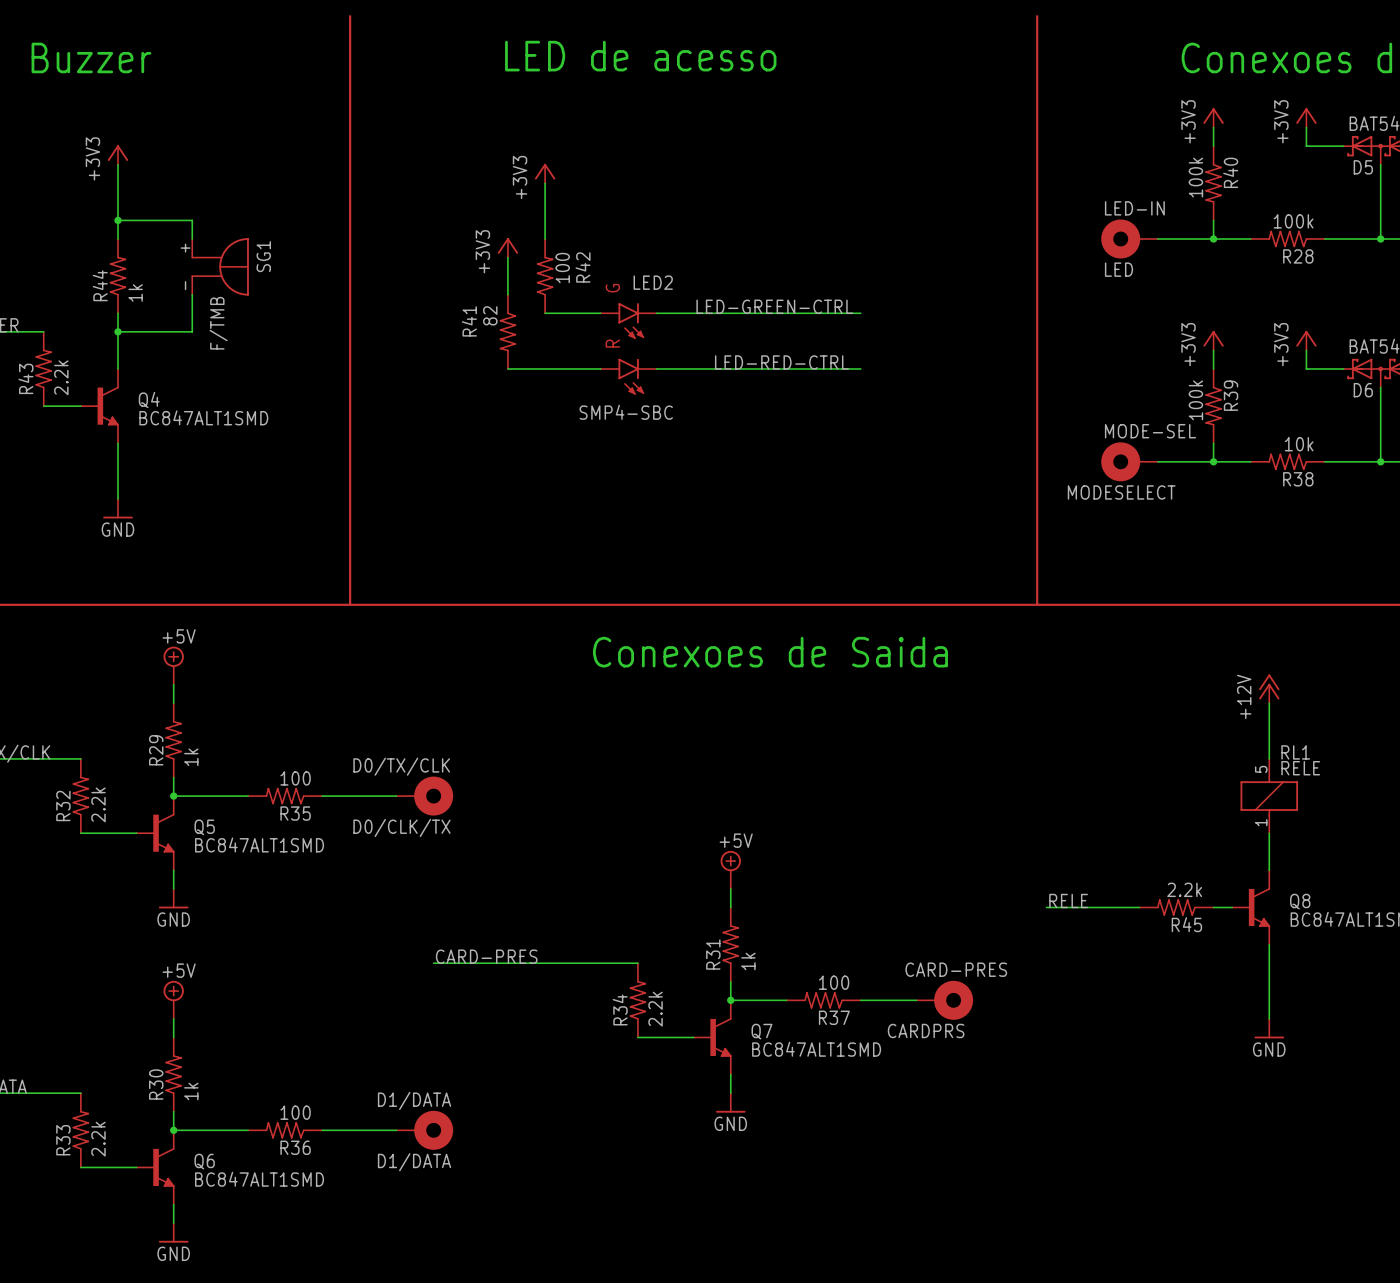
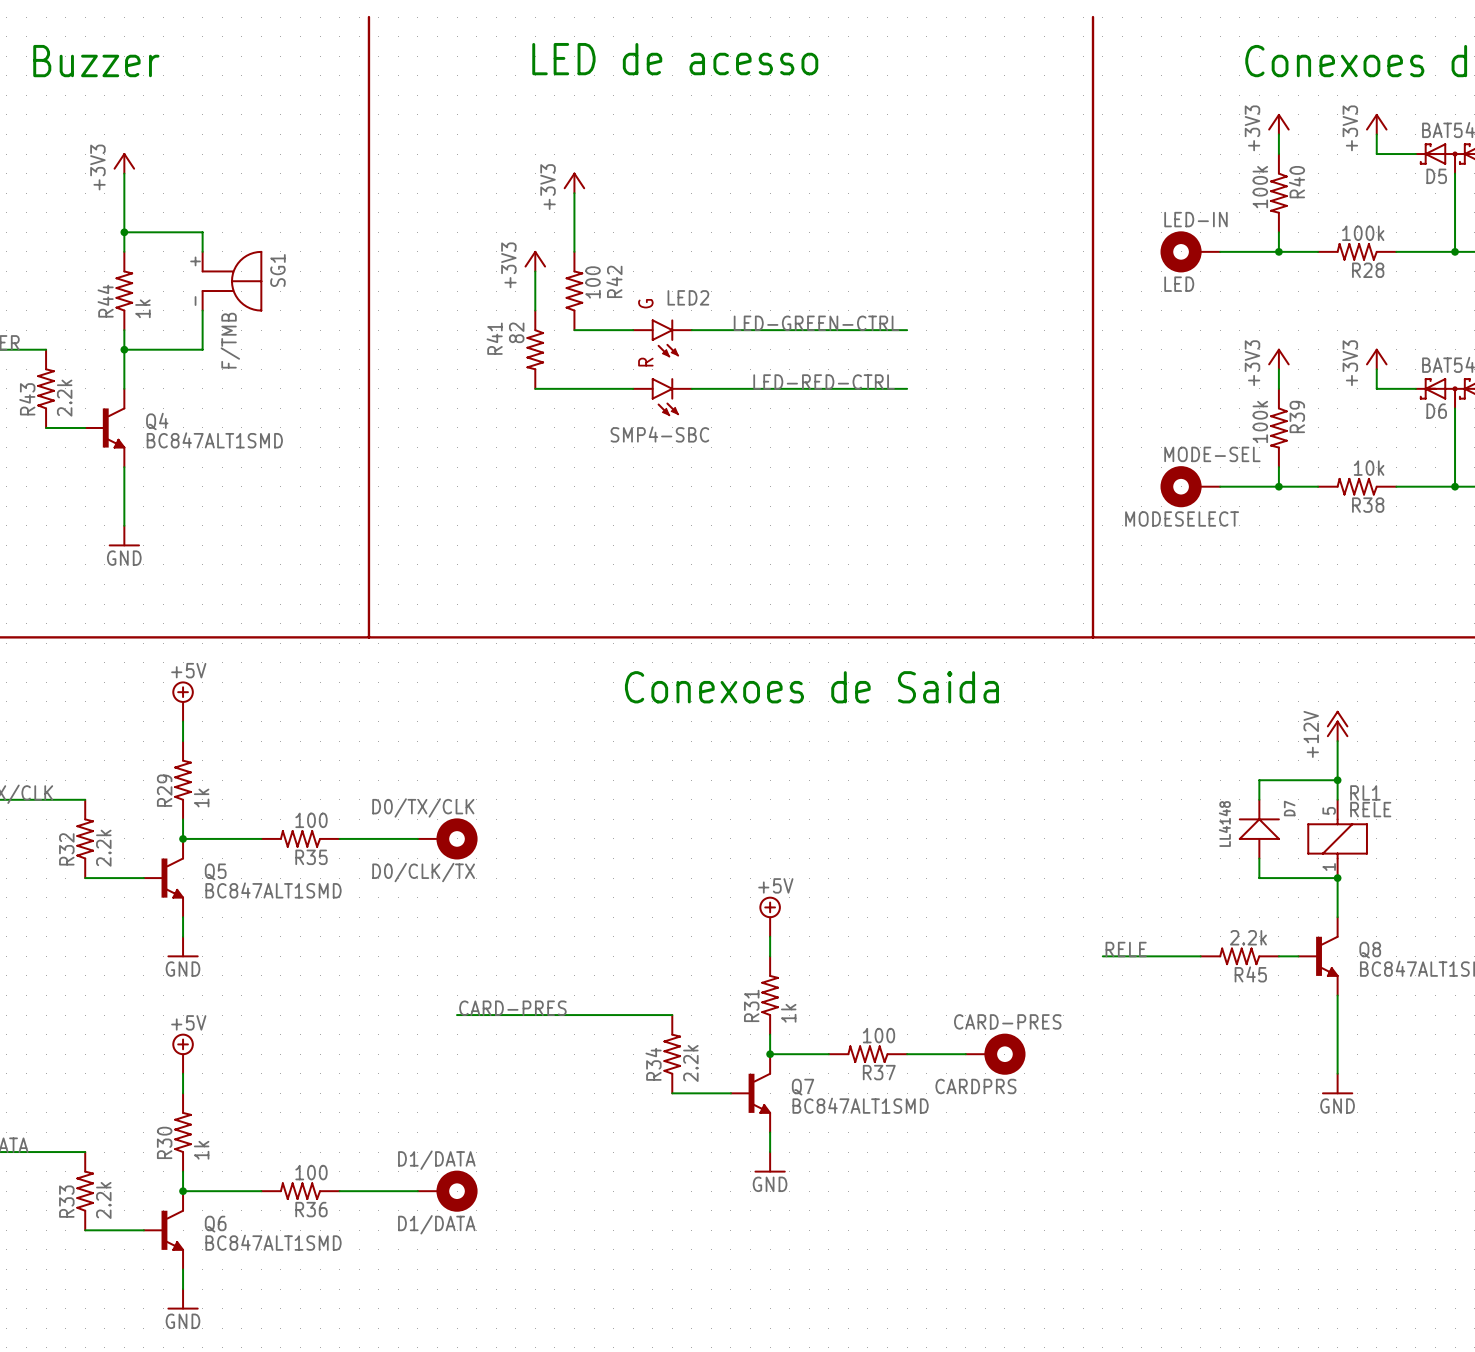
wire: none -> (1337, 780) (1259, 780) (1259, 799)
junction: none -> (1337, 780)
D7: none -> LL4148 (1259, 829)
wire: none -> (1259, 858) (1259, 878) (1337, 878)
junction: none -> (1337, 878)

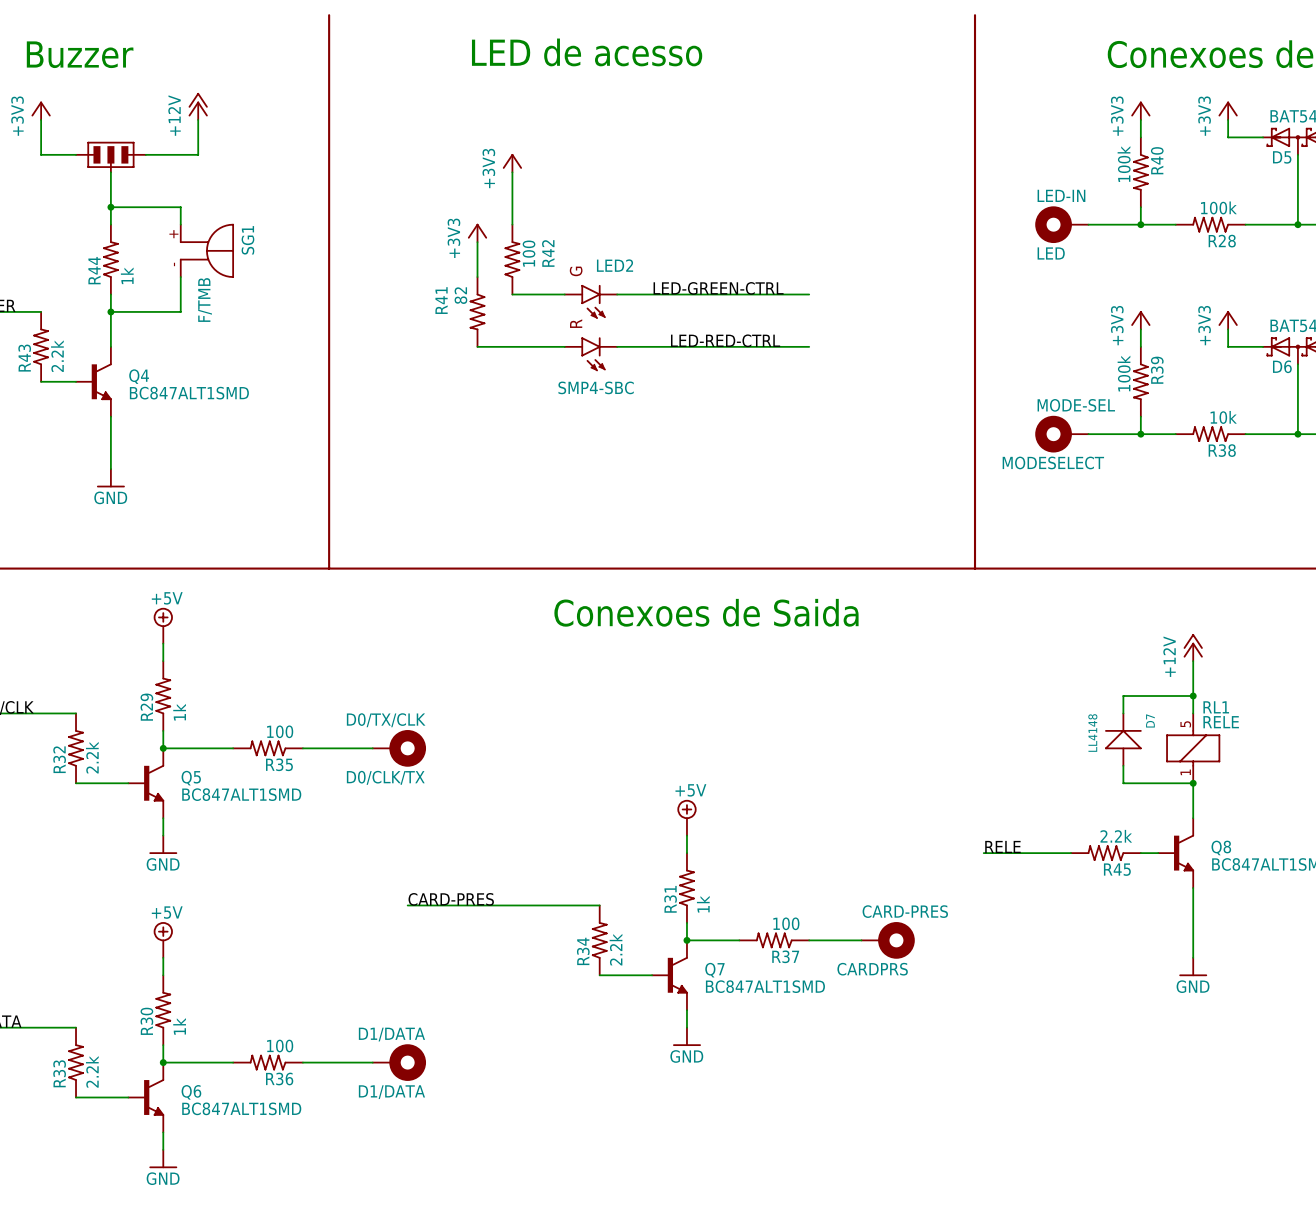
power symbol: none -> +12V (198, 106)
wire: none -> (41, 119) (41, 154) (76, 154)
wire: none -> (198, 119) (198, 154) (145, 154)
power symbol position: +3V3 (124, 163) -> +3V3 (41, 110)
part: none -> (110, 157)

